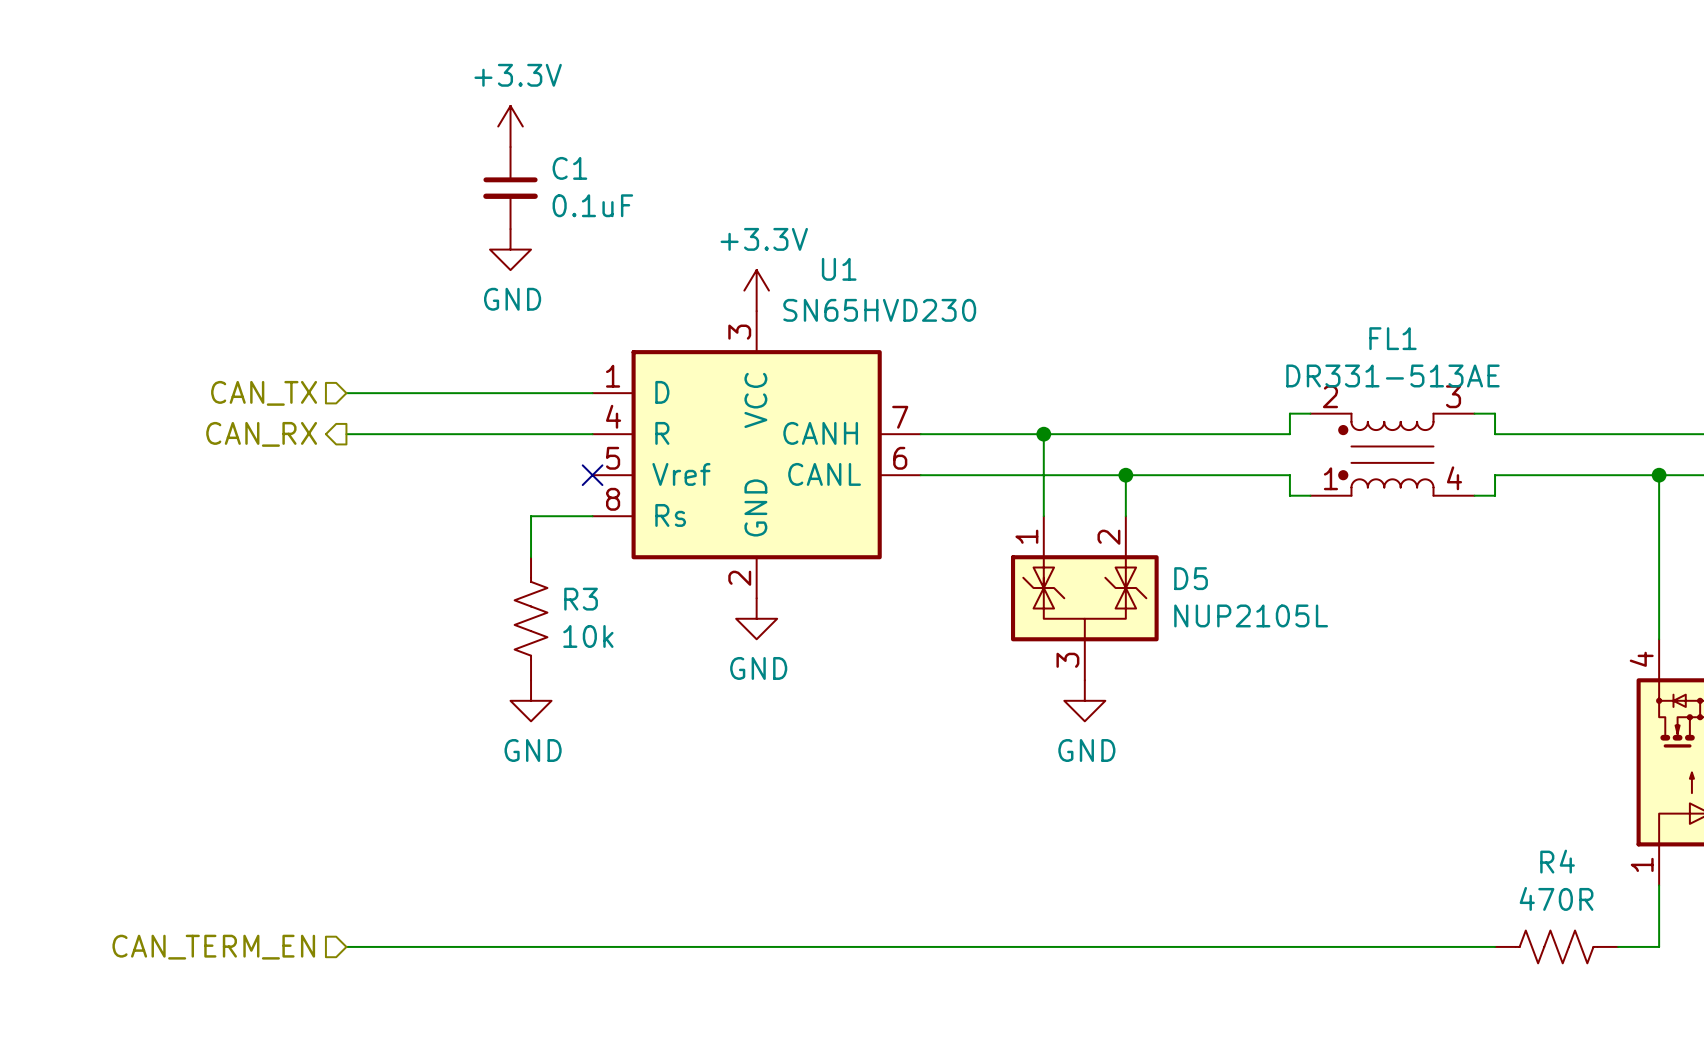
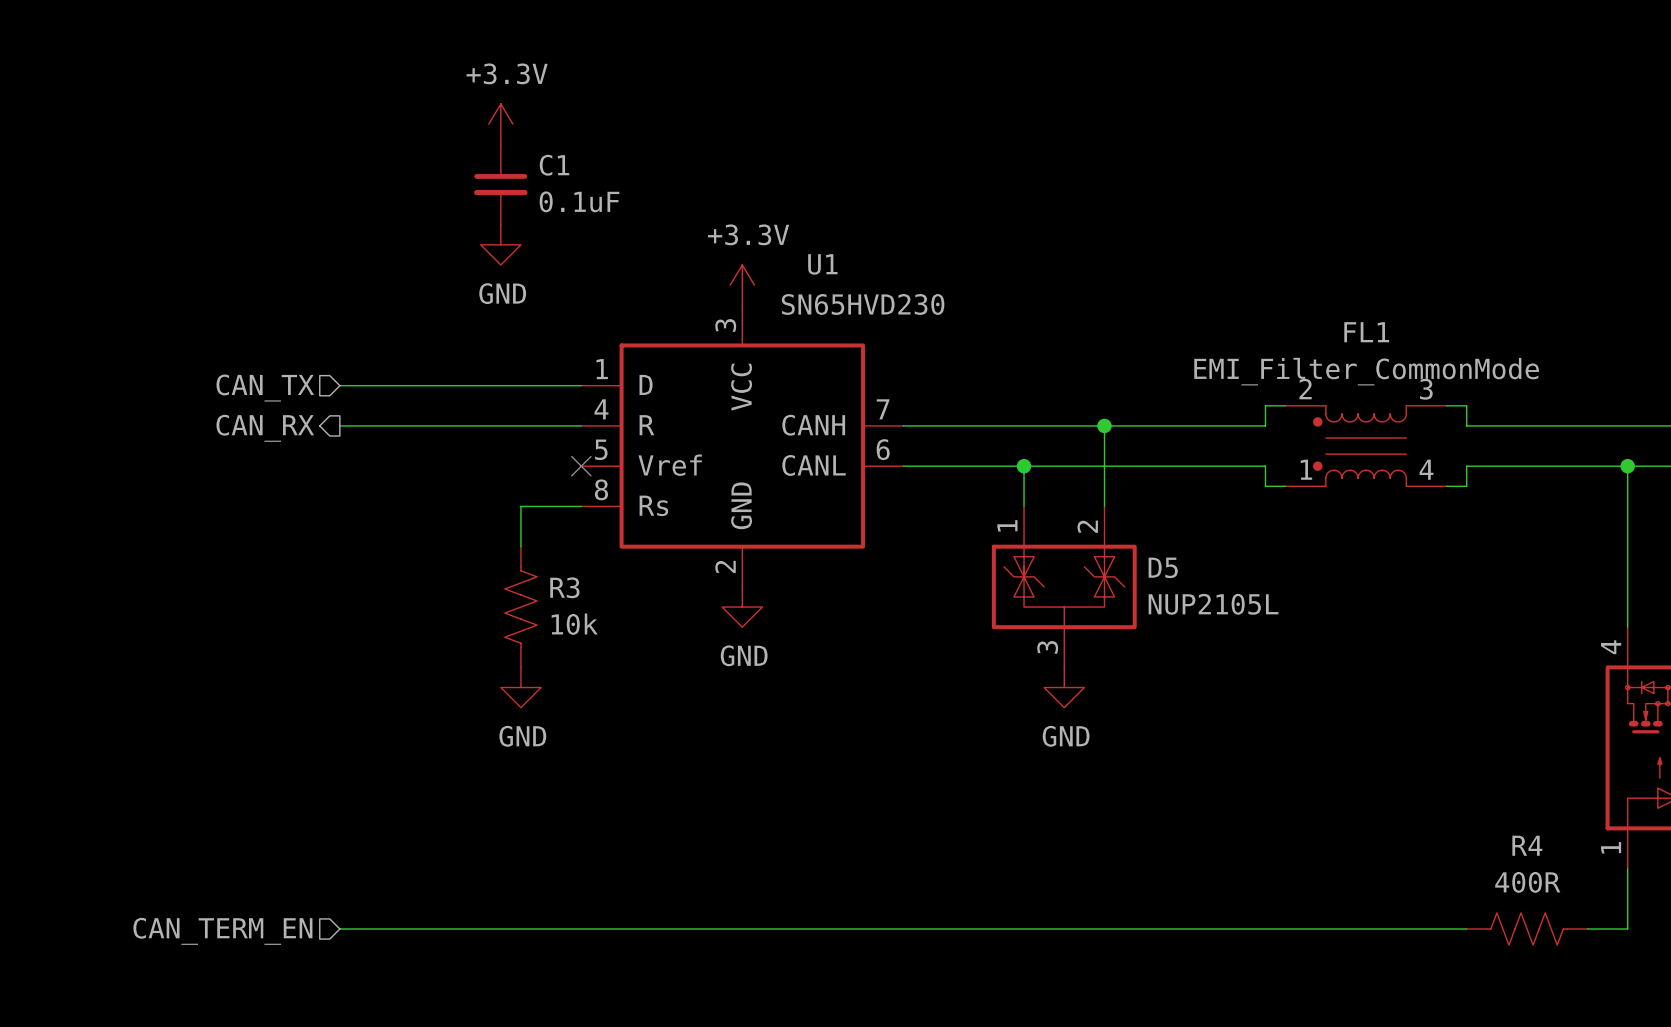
FL1 value: DR331-513AE (1392, 375) -> EMI_Filter_CommonMode (1366, 371)
wire: (1043, 434) (1043, 475) -> (1104, 425) (1104, 466)
junction: (1043, 434) -> none
junction: none -> (1104, 425)
junction: none -> (1024, 466)
junction: (1125, 475) -> none
R4 value: 470R (1556, 898) -> 400R (1527, 882)

